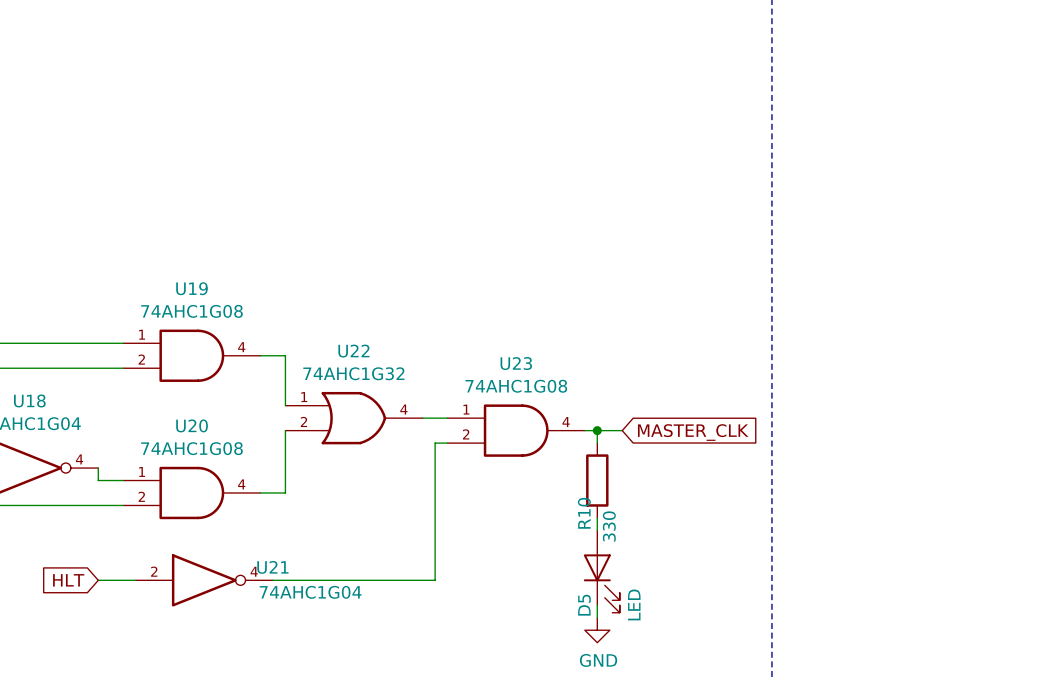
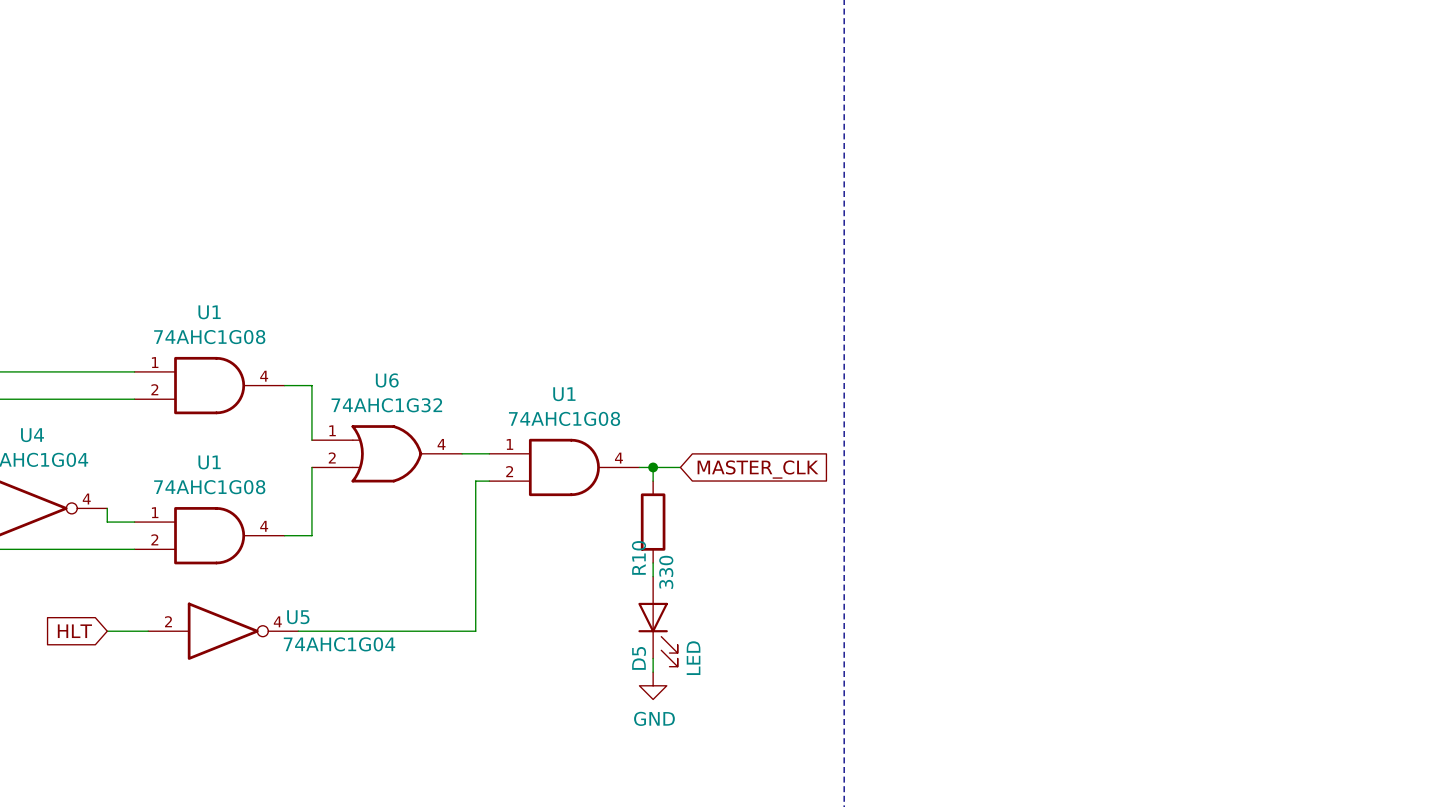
U19 name: U19 (192, 288) -> U1 (209, 312)
U22 name: U22 (353, 351) -> U6 (387, 380)
U23 name: U23 (516, 363) -> U1 (564, 394)
U18 name: U18 (29, 400) -> U4 (32, 435)
U20 name: U20 (192, 425) -> U1 (209, 462)
U21 name: U21 (272, 567) -> U5 (298, 617)

